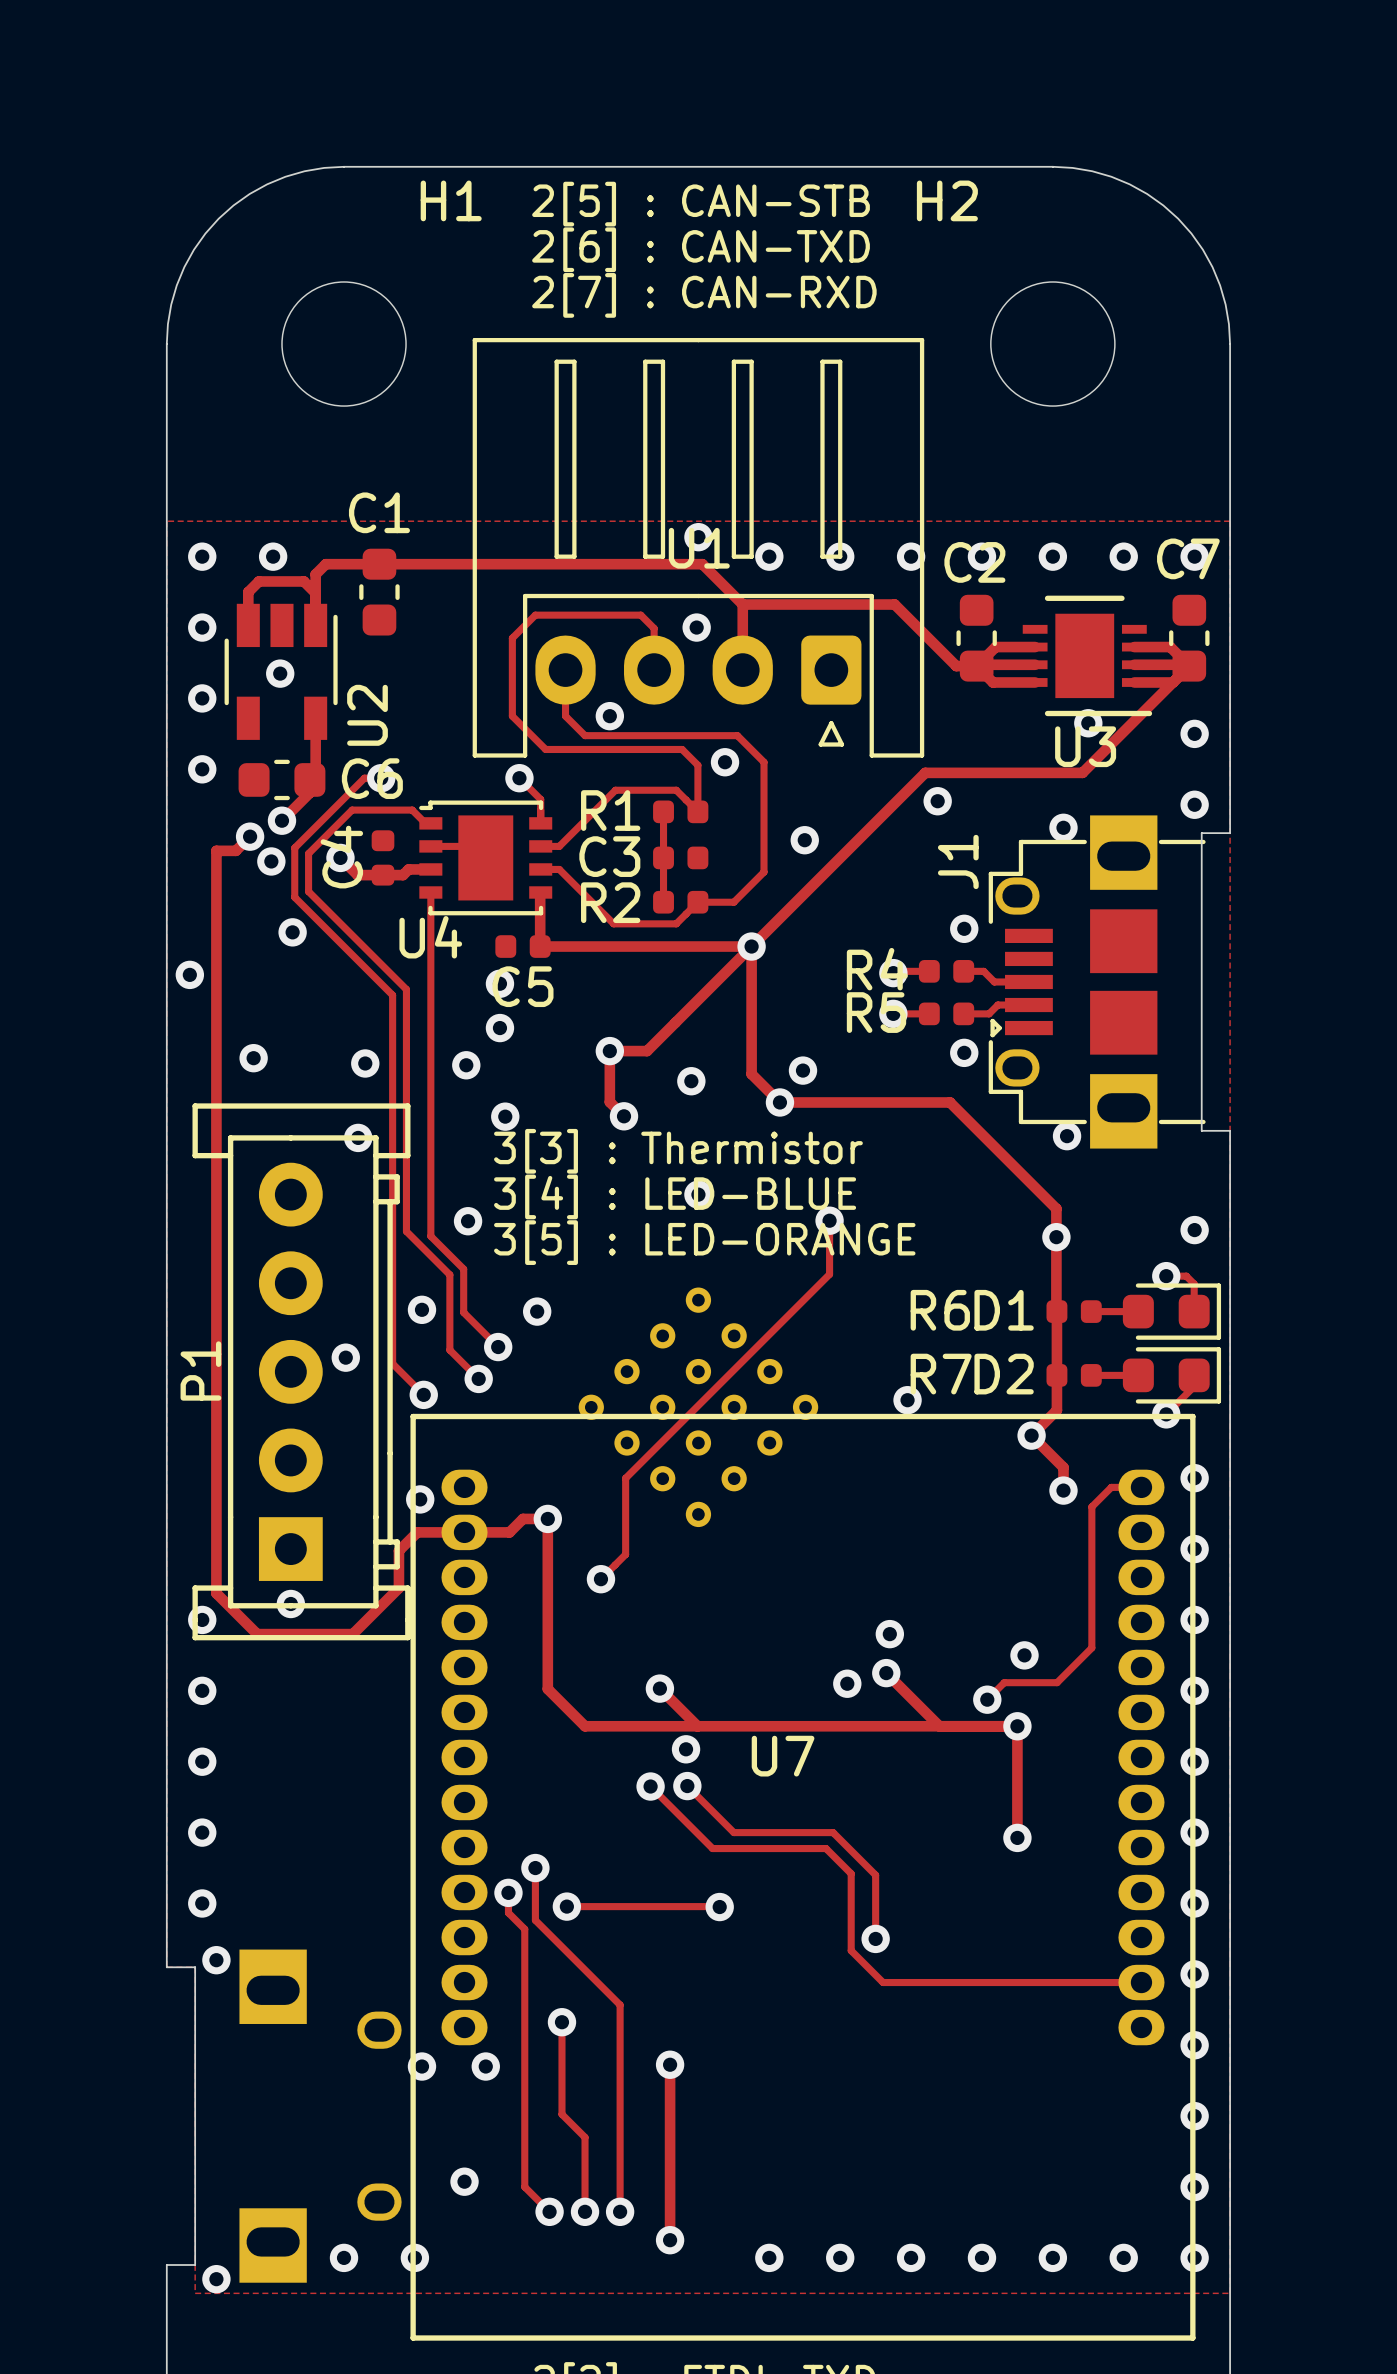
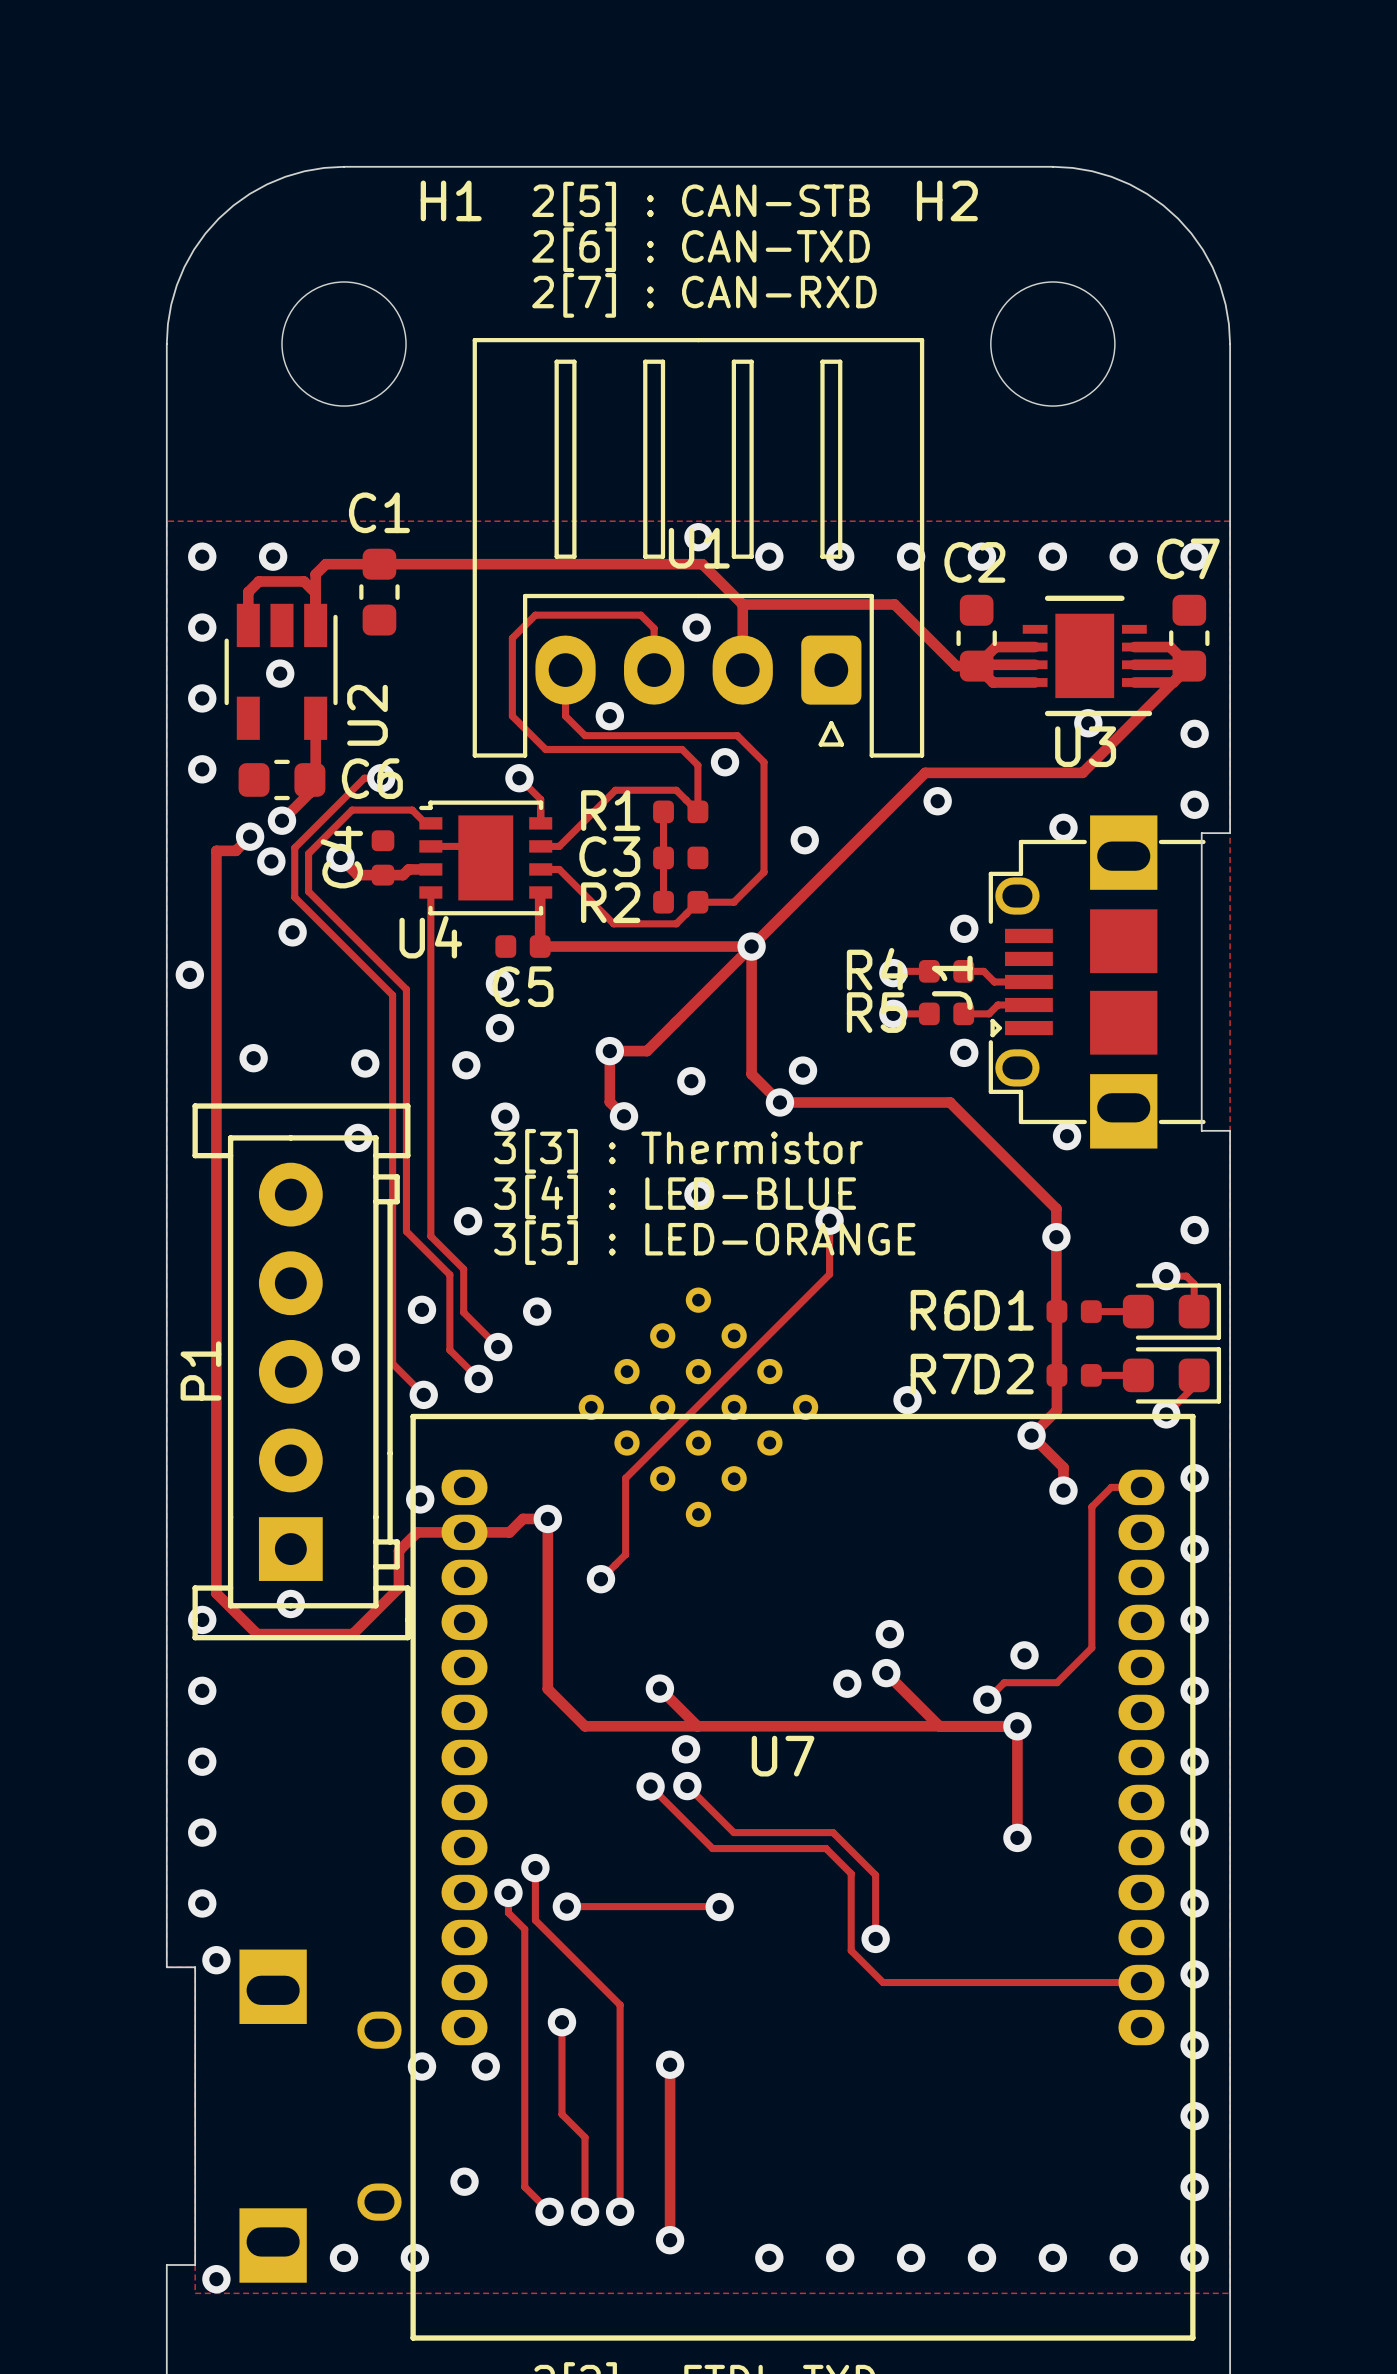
J1 name position: J1 (958, 861) -> J1 (952, 982)

